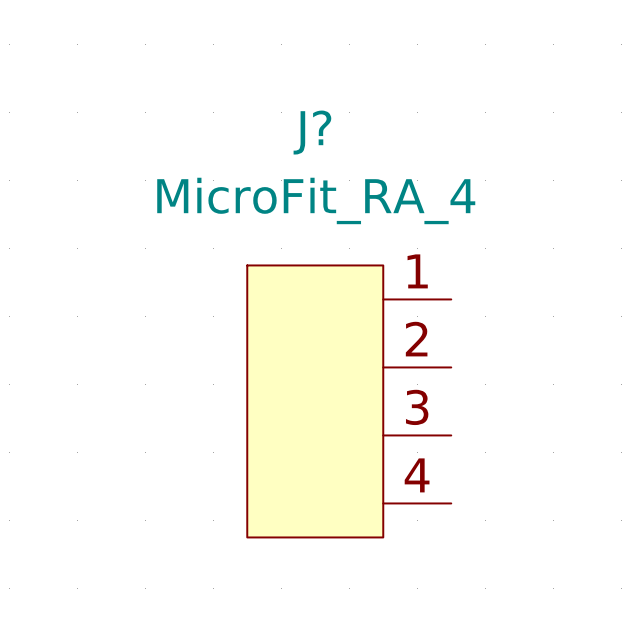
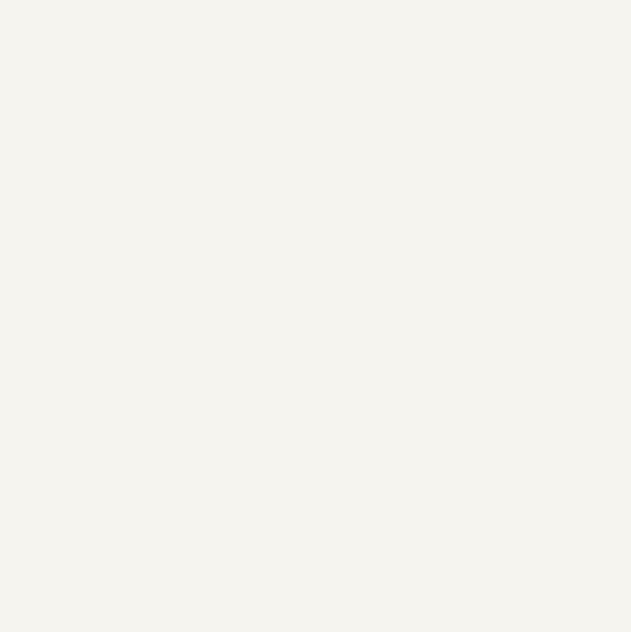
J?: MicroFit_RA_4 (349, 401) -> none

